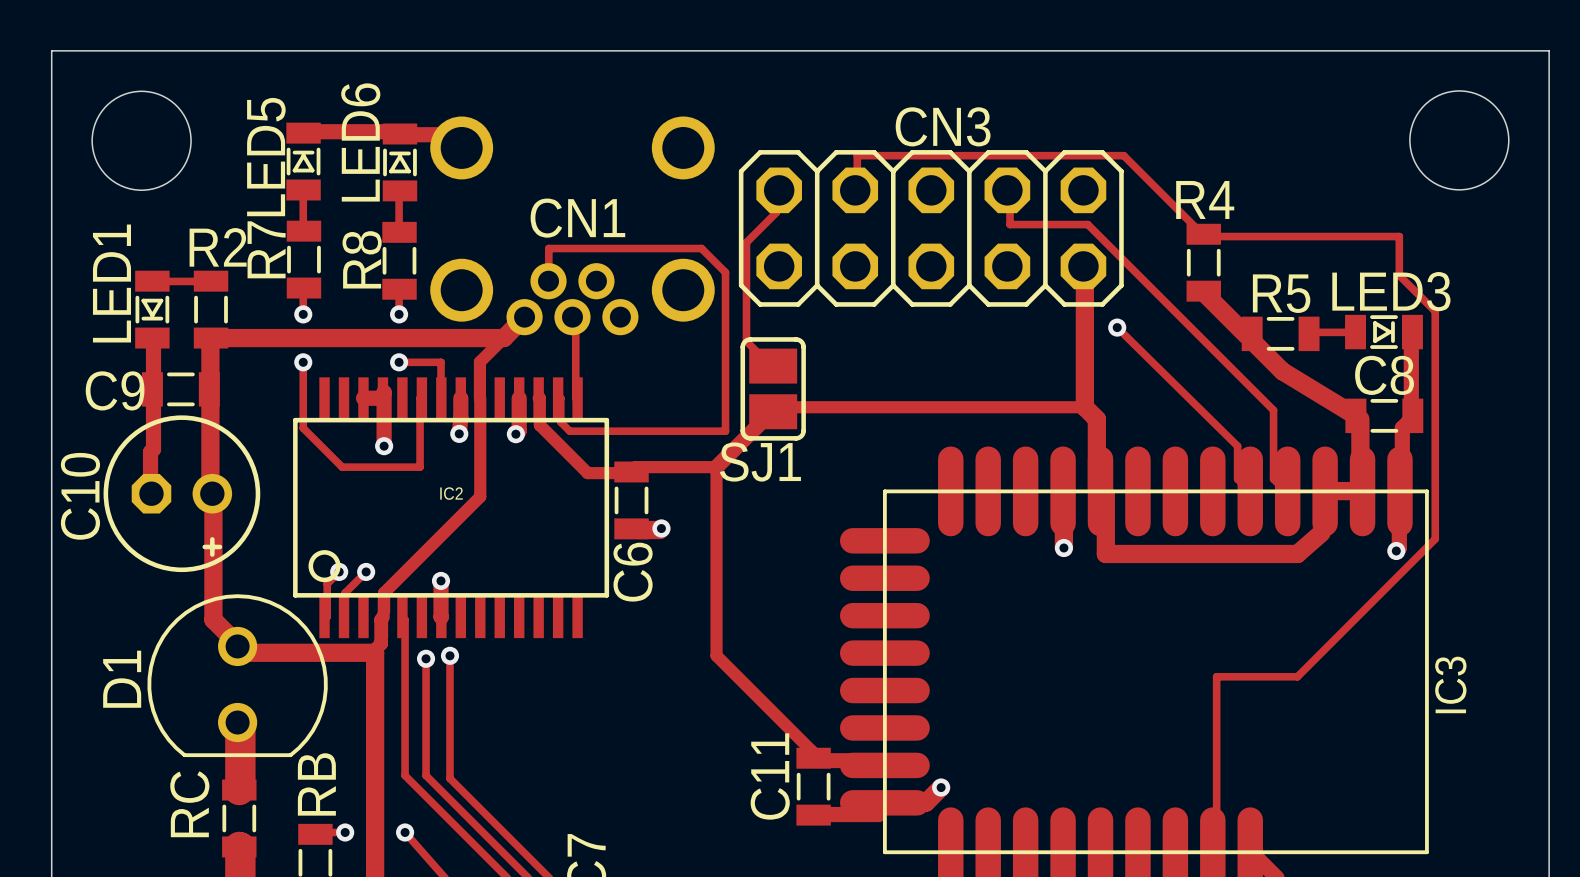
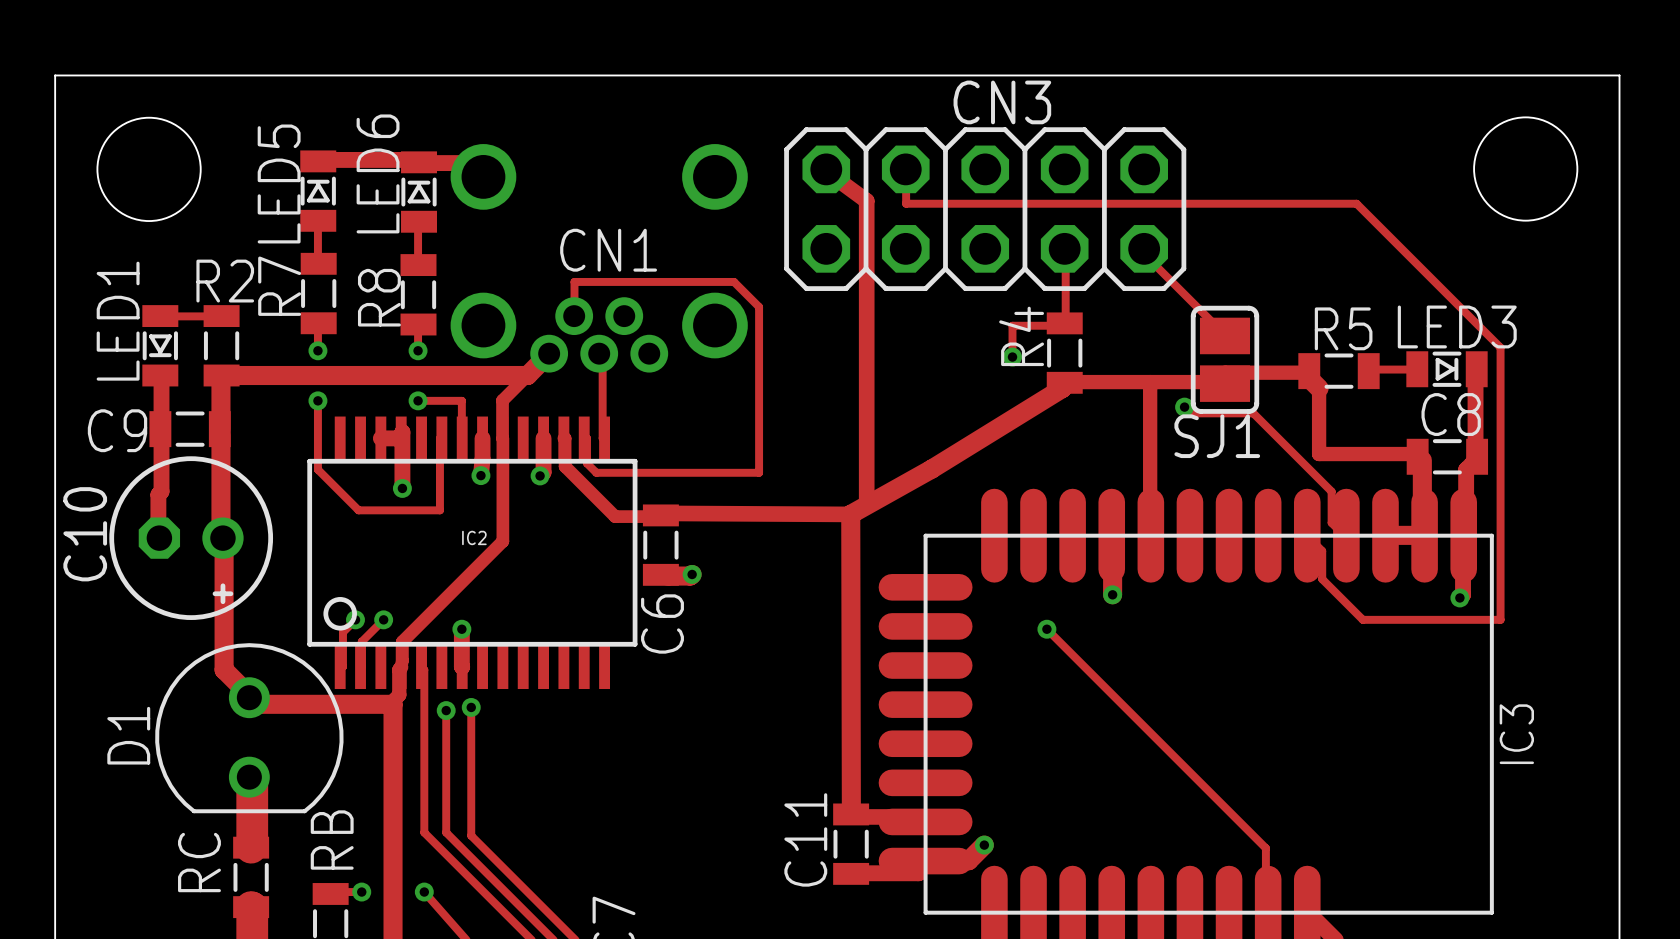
CN3 name position: CN3 (943, 126) -> CN3 (1002, 102)
track: none -> (826, 169) (866, 200) (866, 505) (850, 514)
track: (779, 190) (776, 212) (746, 242) (746, 341) (773, 366) -> none
track: (855, 190) (857, 188) (857, 155) (1123, 155) (1204, 236) (1399, 236) (1399, 275) -> (905, 169) (906, 203) (1356, 203) (1463, 310)
track: (1007, 190) (1010, 191) (1010, 224) (1087, 224) (1273, 410) (1273, 449) -> (1184, 407) (1184, 413) (1253, 413) (1331, 491)
R4 name rotation: 0° (1205, 199) -> 90° counterclockwise (1021, 336)
track: none -> (1064, 248) (1065, 322) (1062, 325) (1012, 325) (1012, 357)
track: none -> (1144, 248) (1147, 250) (1147, 256) (1224, 335)
CN3 position: (931, 228) -> (985, 209)
R4 position: (1203, 262) -> (1064, 353)
track: (1083, 266) (1084, 407) -> none
track: (1203, 291) (1246, 335) (1252, 333) -> (850, 514) (931, 469) (1062, 388) (1064, 382) (1218, 382) (1224, 383) (1225, 372) (1306, 372) (1309, 371)
via: none -> (1012, 357)
track: (1117, 327) (1237, 446) (1237, 479) (1250, 491) -> none
via position: (1117, 327) -> (1184, 407)
track: none -> (1150, 382) (1150, 535)
track: (1261, 350) (1282, 371) (1351, 413) -> (1319, 388) (1319, 454) (1412, 454)
SJ1 position: (773, 388) -> (1224, 359)
track: (1084, 407) (1096, 419) (1096, 488) (1105, 494) (1105, 553) (1297, 553) (1321, 533) (1321, 497) (1325, 491) -> none
track: (1084, 407) (776, 407) (716, 467) -> none
track: (716, 467) (635, 467) (631, 471) -> (850, 514) (677, 513) (671, 516) (660, 515)
track: (716, 467) (716, 655) (812, 751) (813, 758) -> (850, 514) (851, 814)
track: (1435, 539) (1297, 676) (1216, 676) (1216, 850) (1212, 852) -> (1500, 585) (1500, 619) (1362, 619) (1322, 579) (1322, 551) (1307, 535)
track: none -> (1046, 629) (1265, 848) (1265, 910) (1268, 912)
via: none -> (1046, 629)

